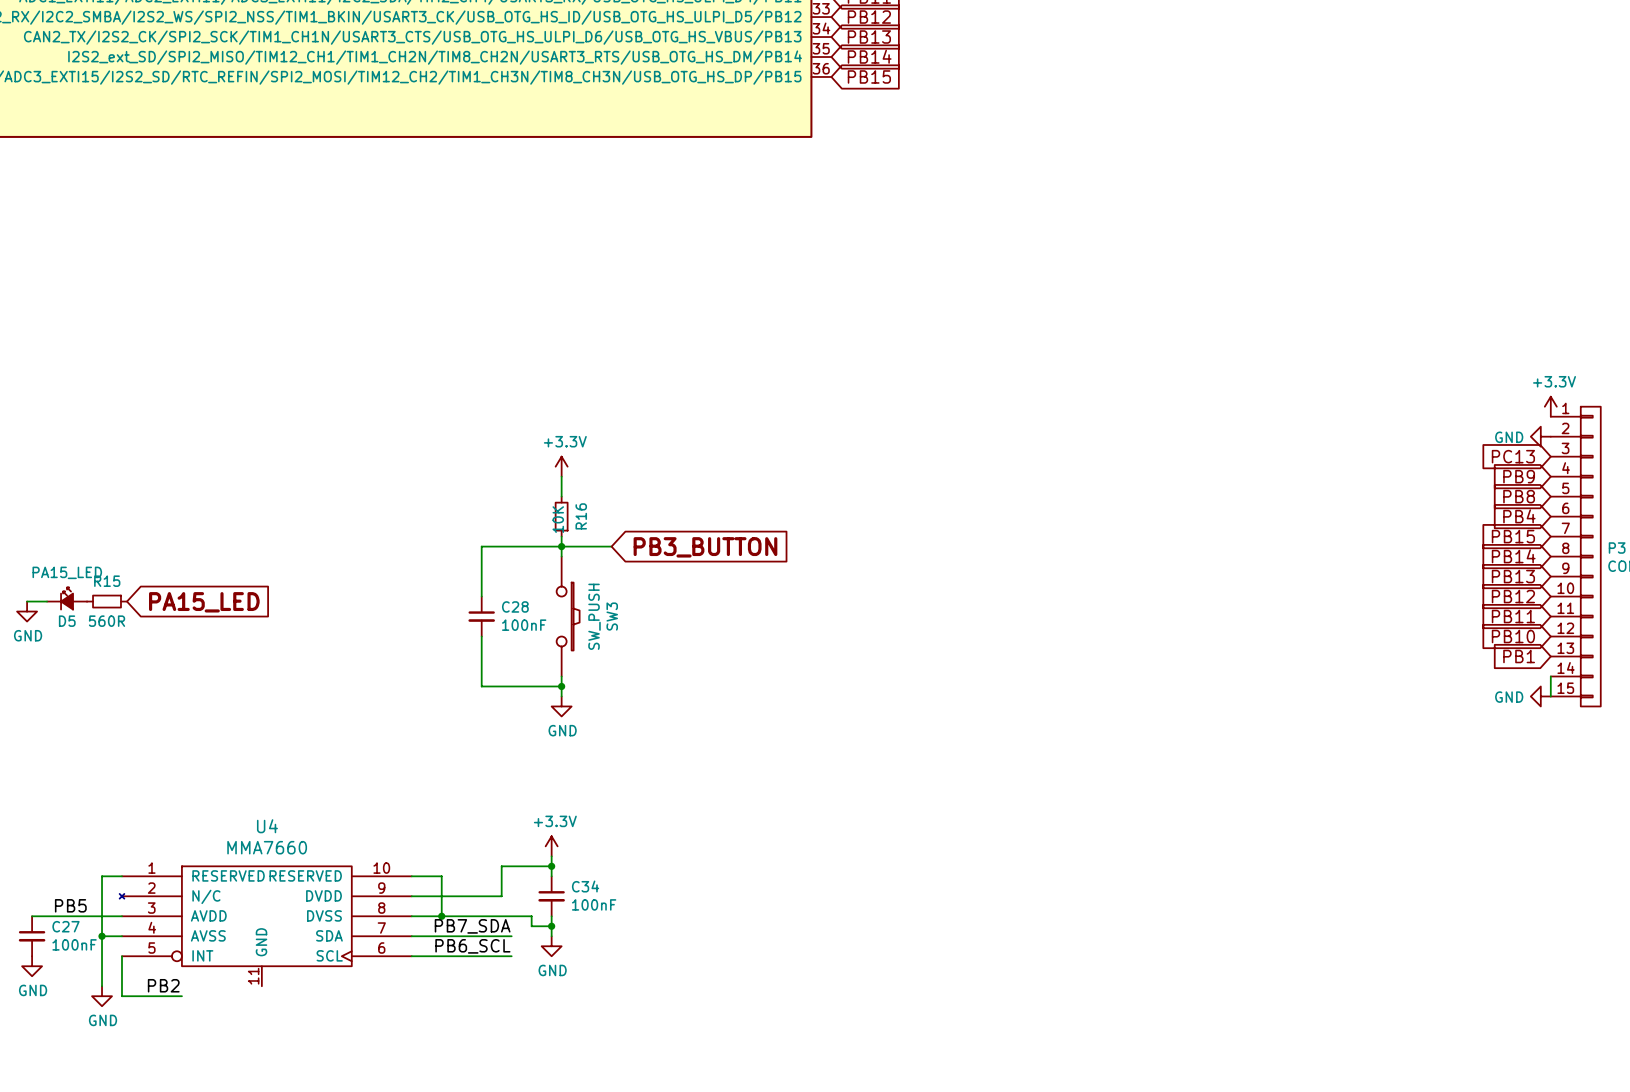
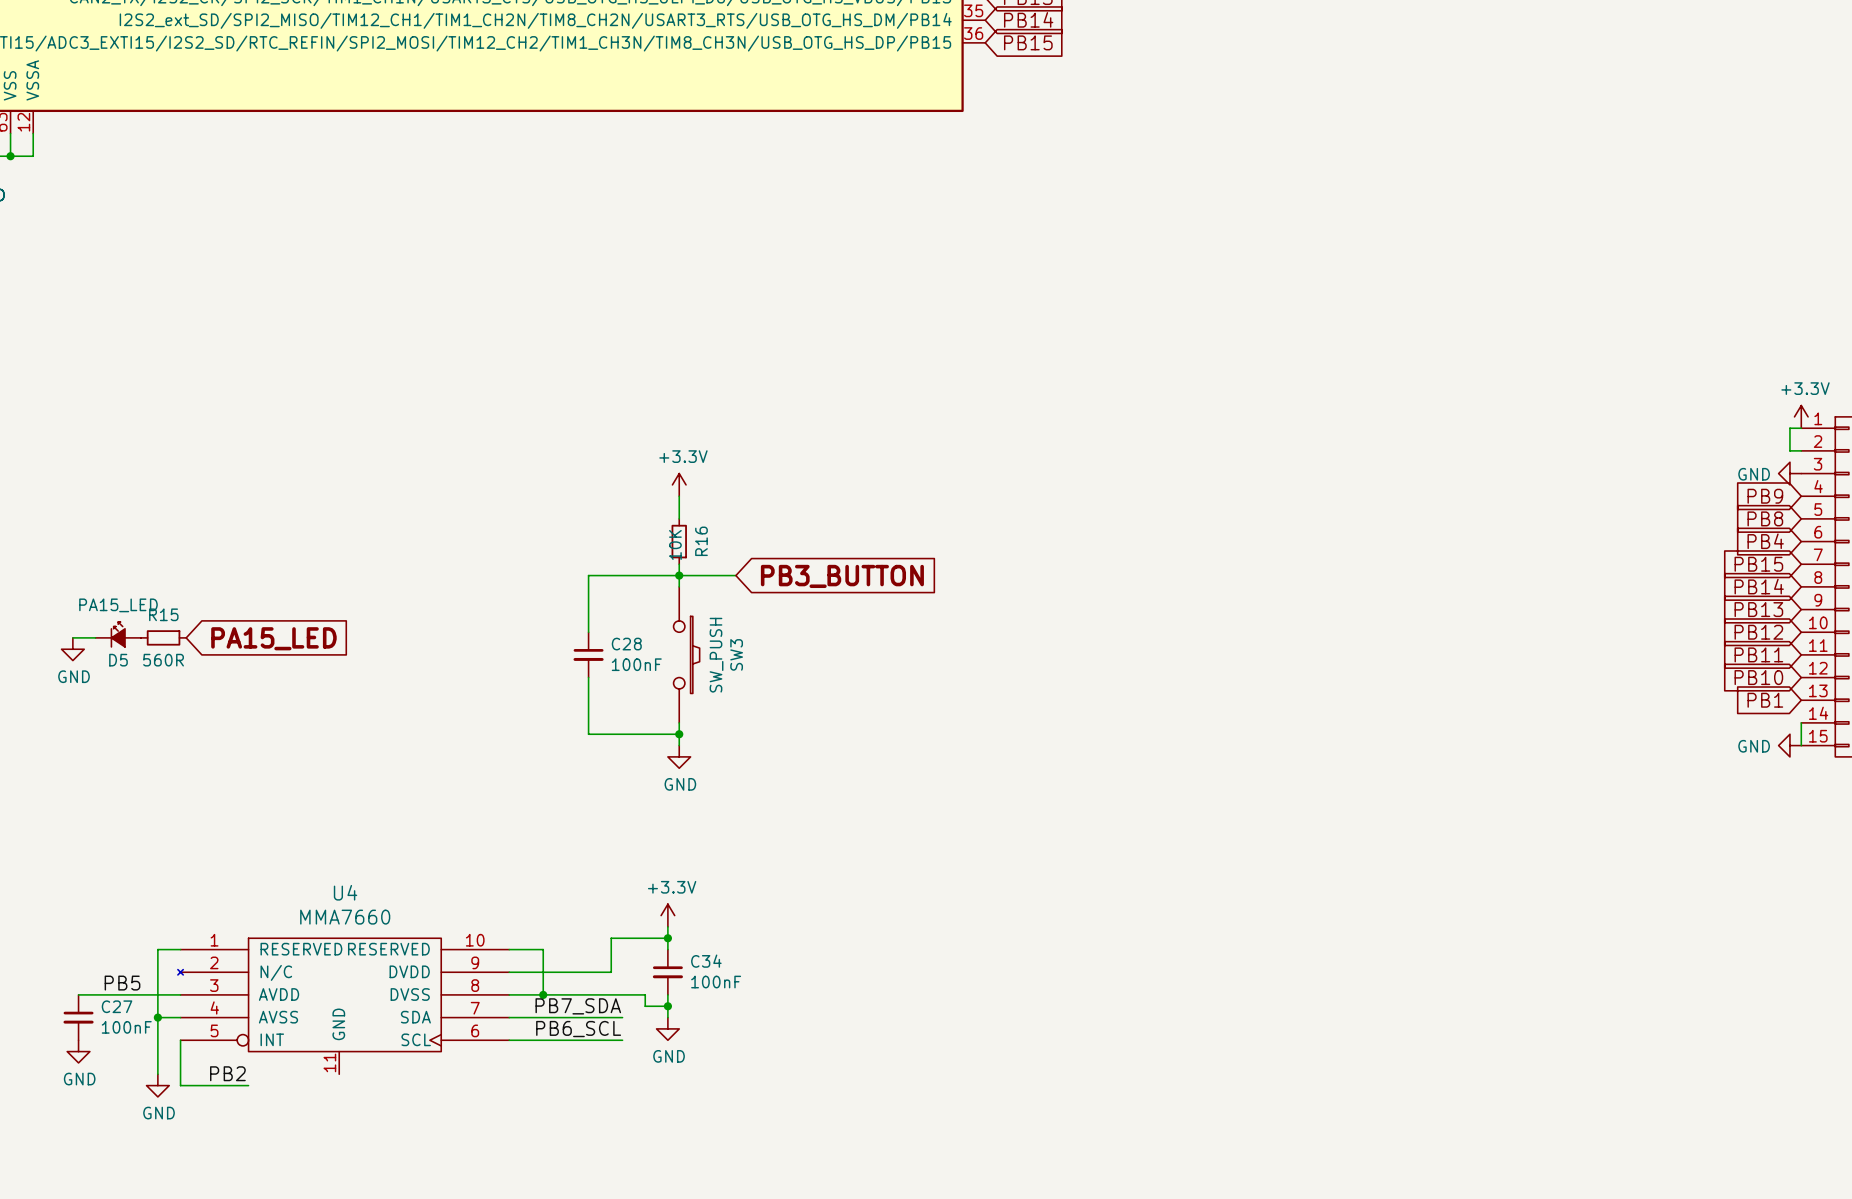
wire: none -> (1801, 428) (1789, 428) (1789, 450) (1801, 450)
power symbol position: GND (1540, 436) -> GND (1789, 473)
global label: PC13 (1513, 456) -> none

